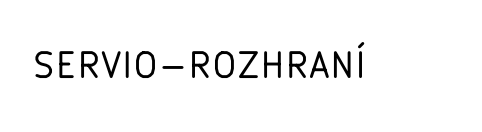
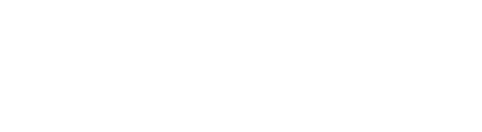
text: SERVIO-ROZHRANÍ (199, 60) -> none

